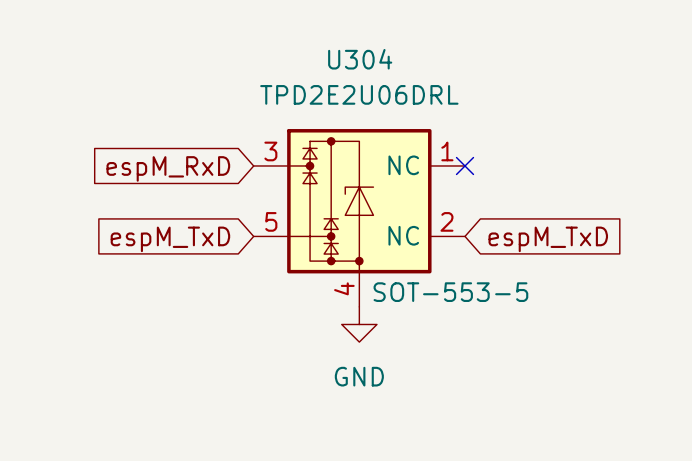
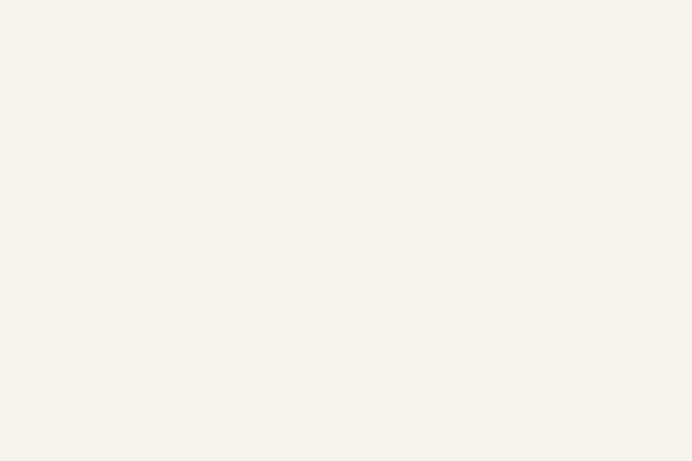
no-connect mark: (465, 165) -> none
global label: espM_RxD (168, 168) -> none
U304: TPD2E2U06DRL (359, 217) -> none
global label: espM_TxD (170, 239) -> none
global label: espM_TxD (548, 239) -> none
power symbol: GND (359, 324) -> none

